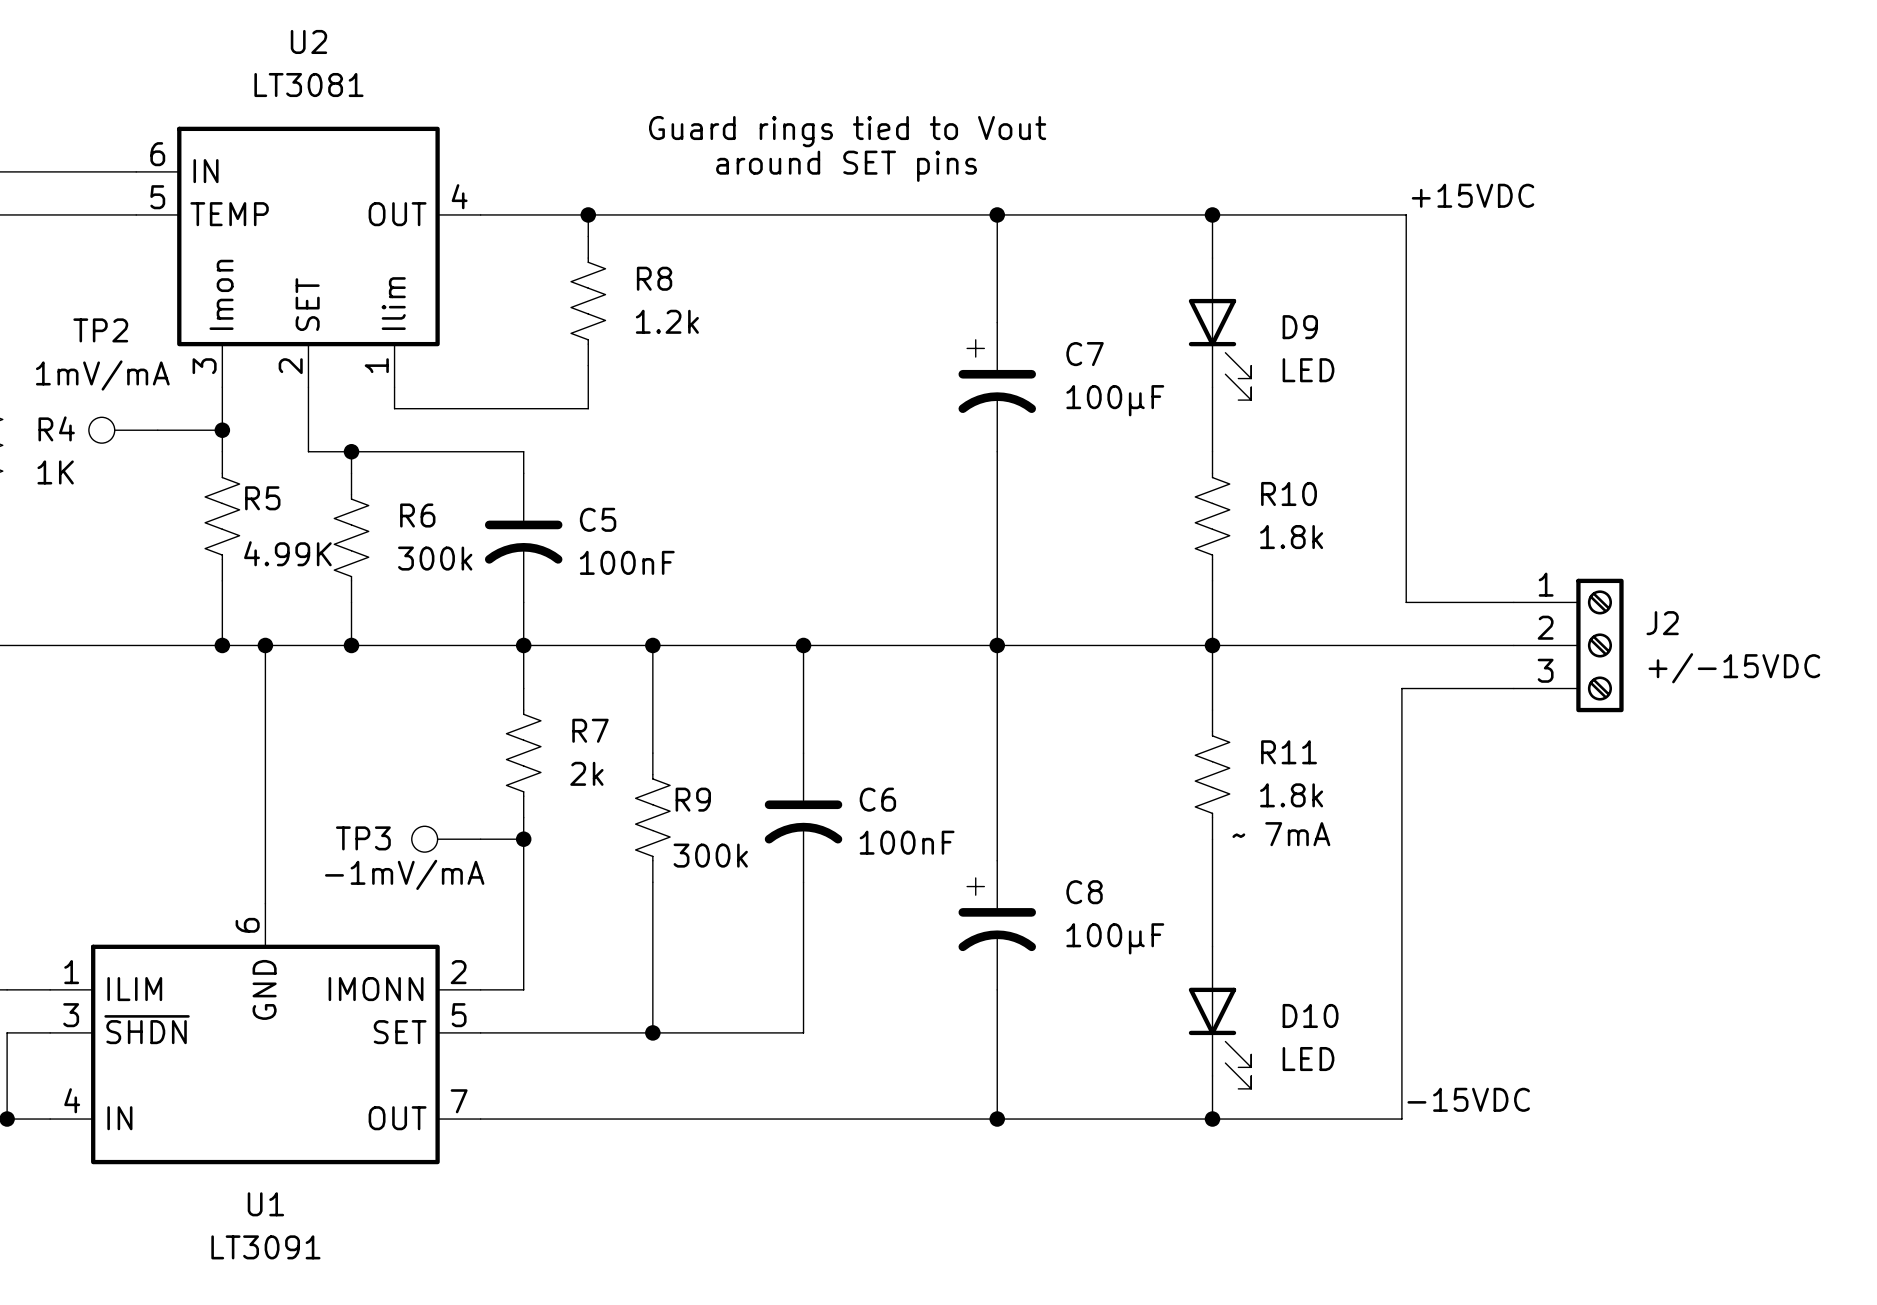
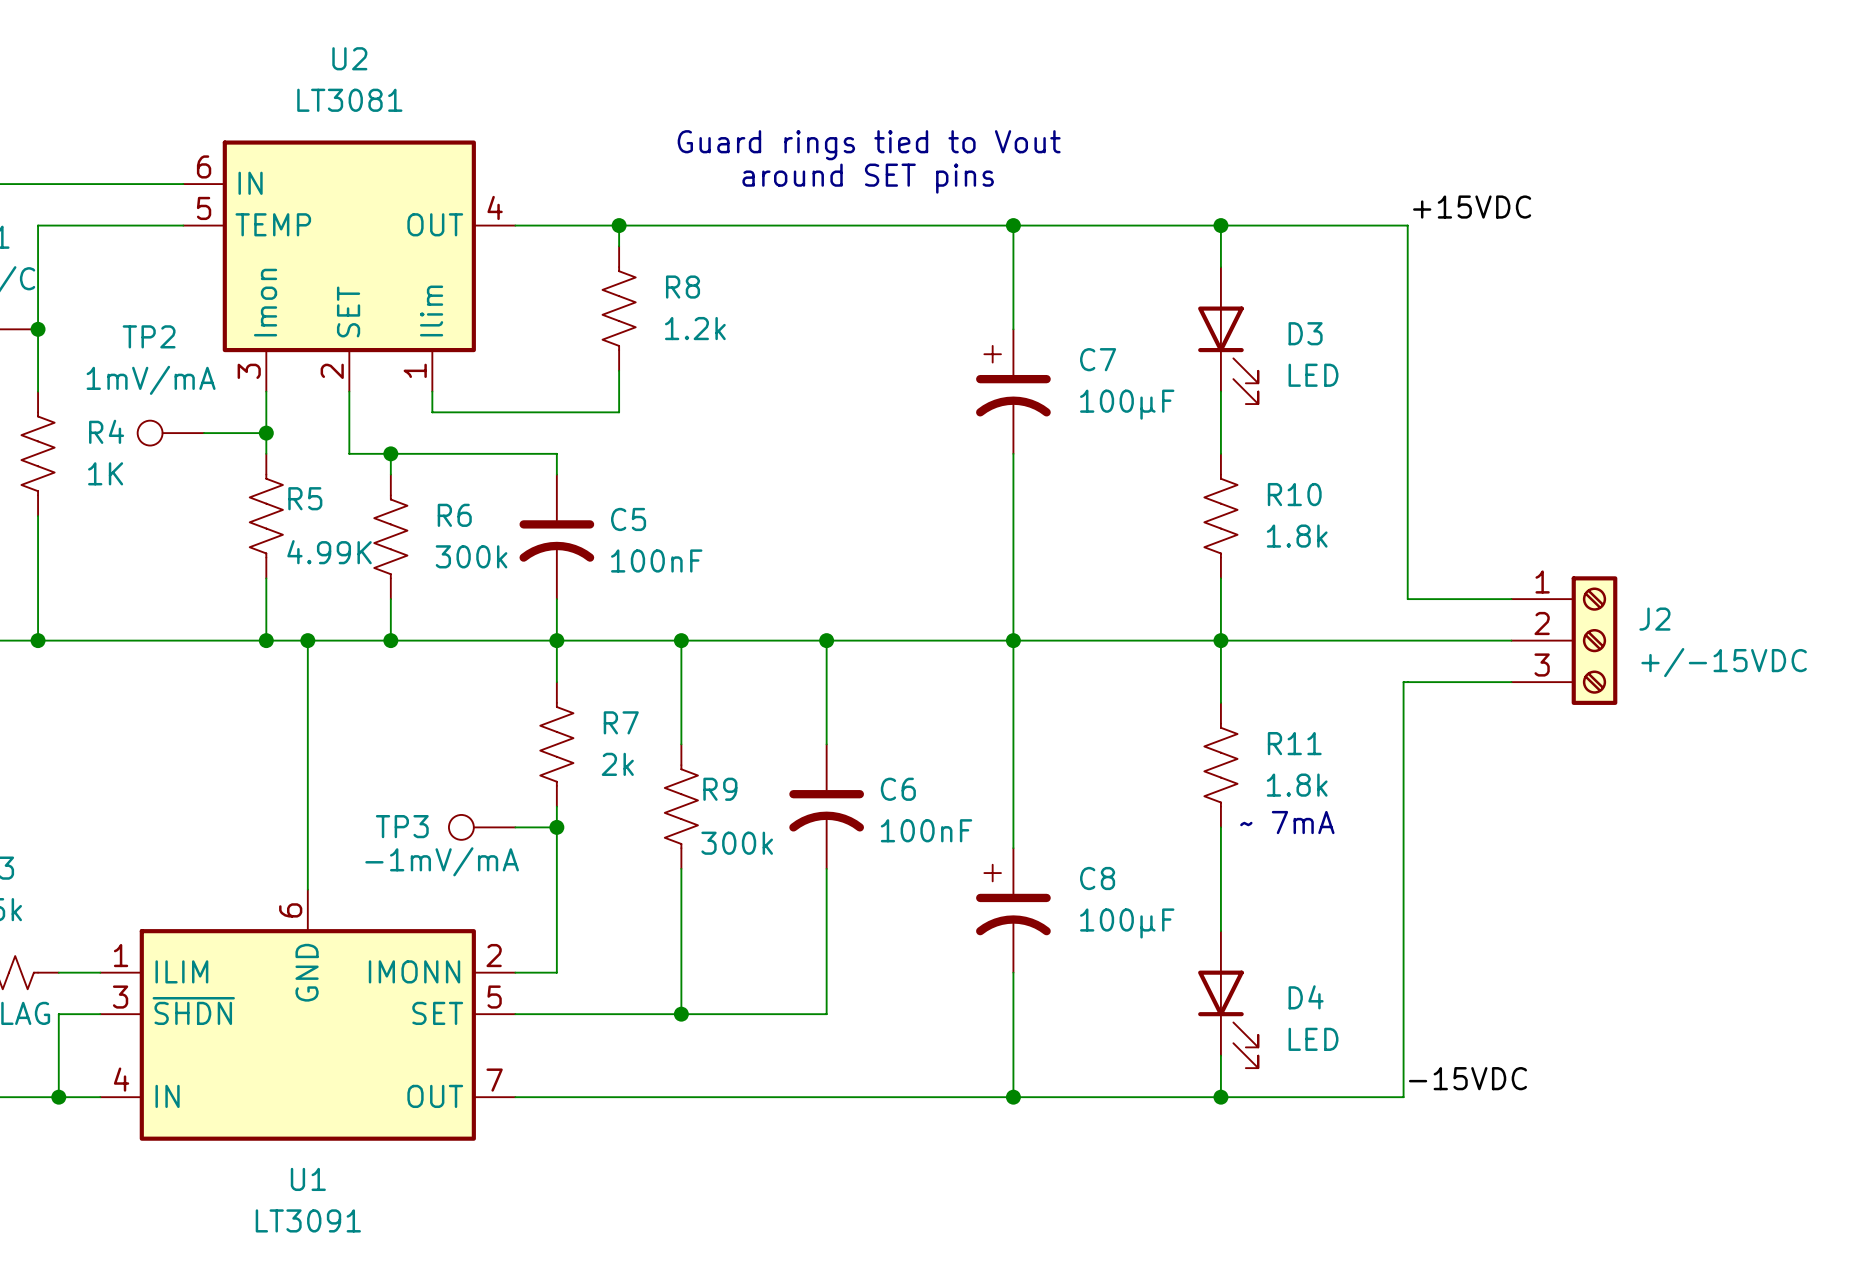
D9 name: D9 (1300, 327) -> D3 (1305, 333)
D10 name: D10 (1310, 1015) -> D4 (1306, 997)

